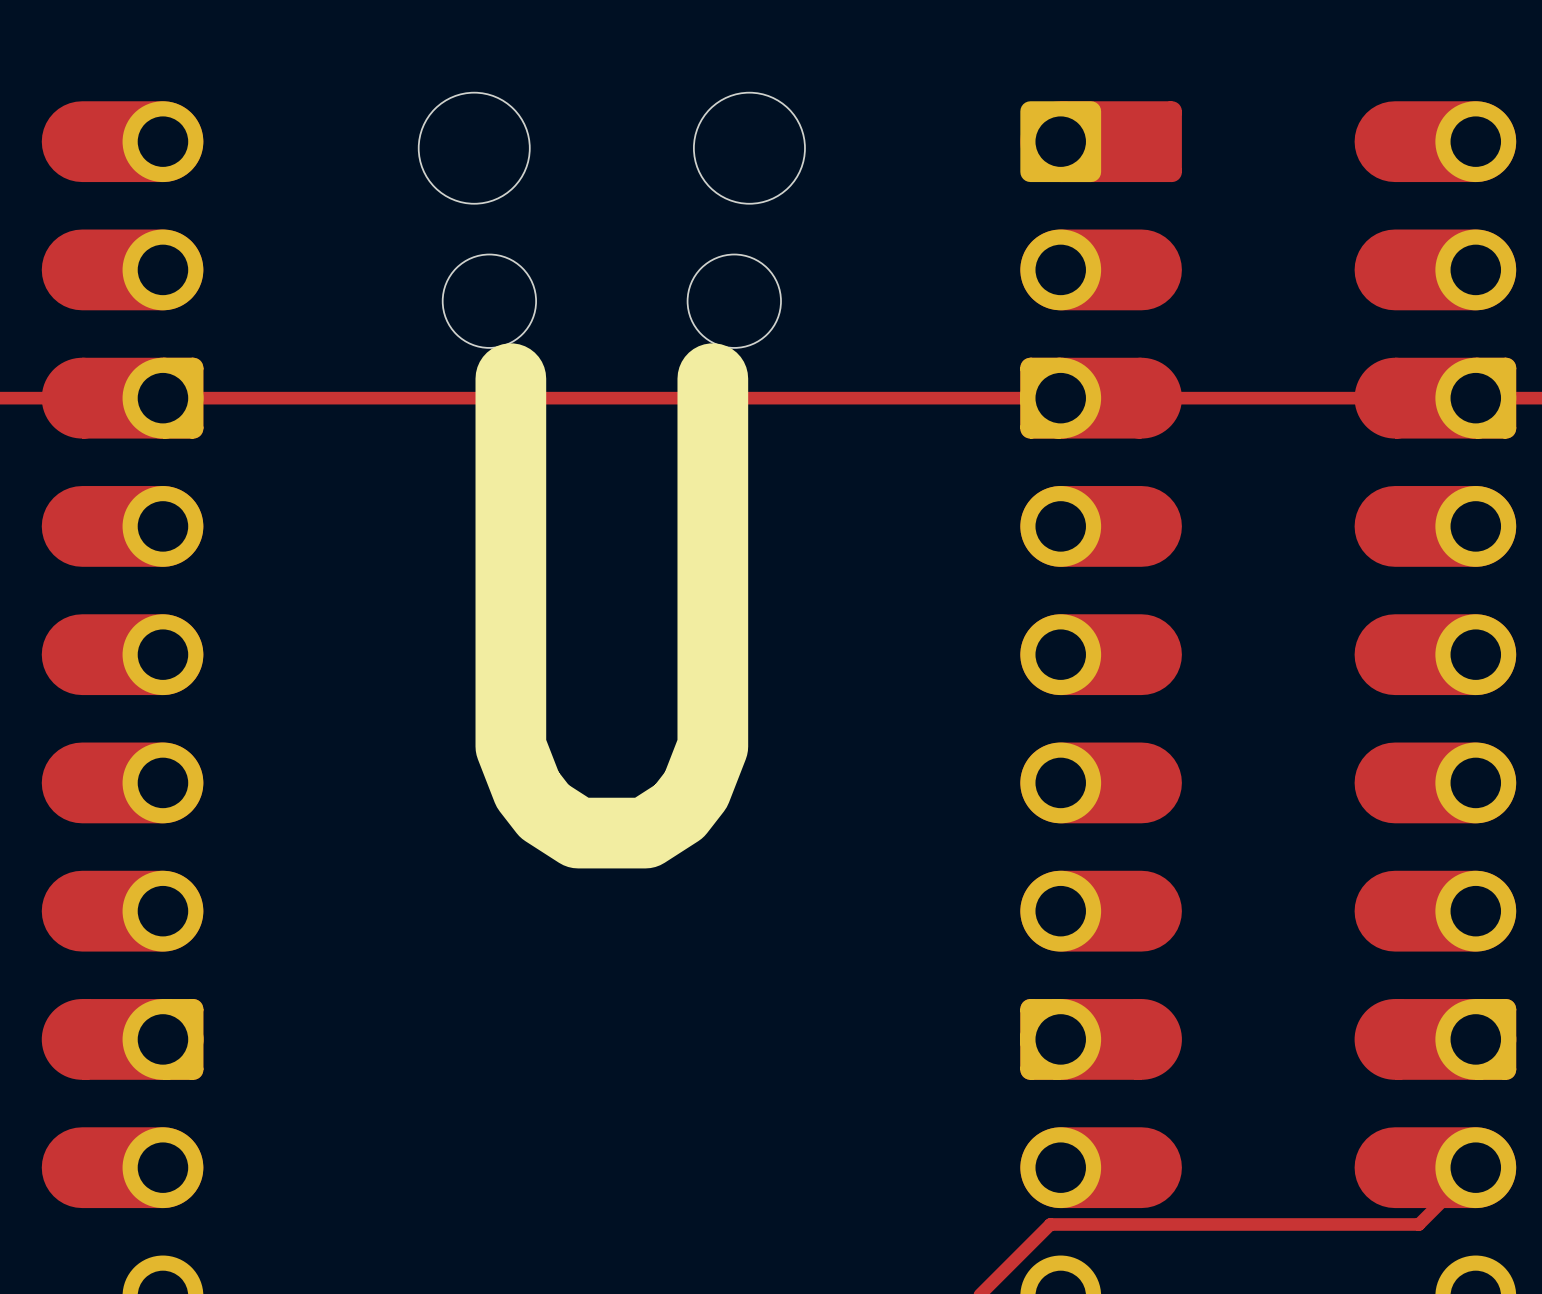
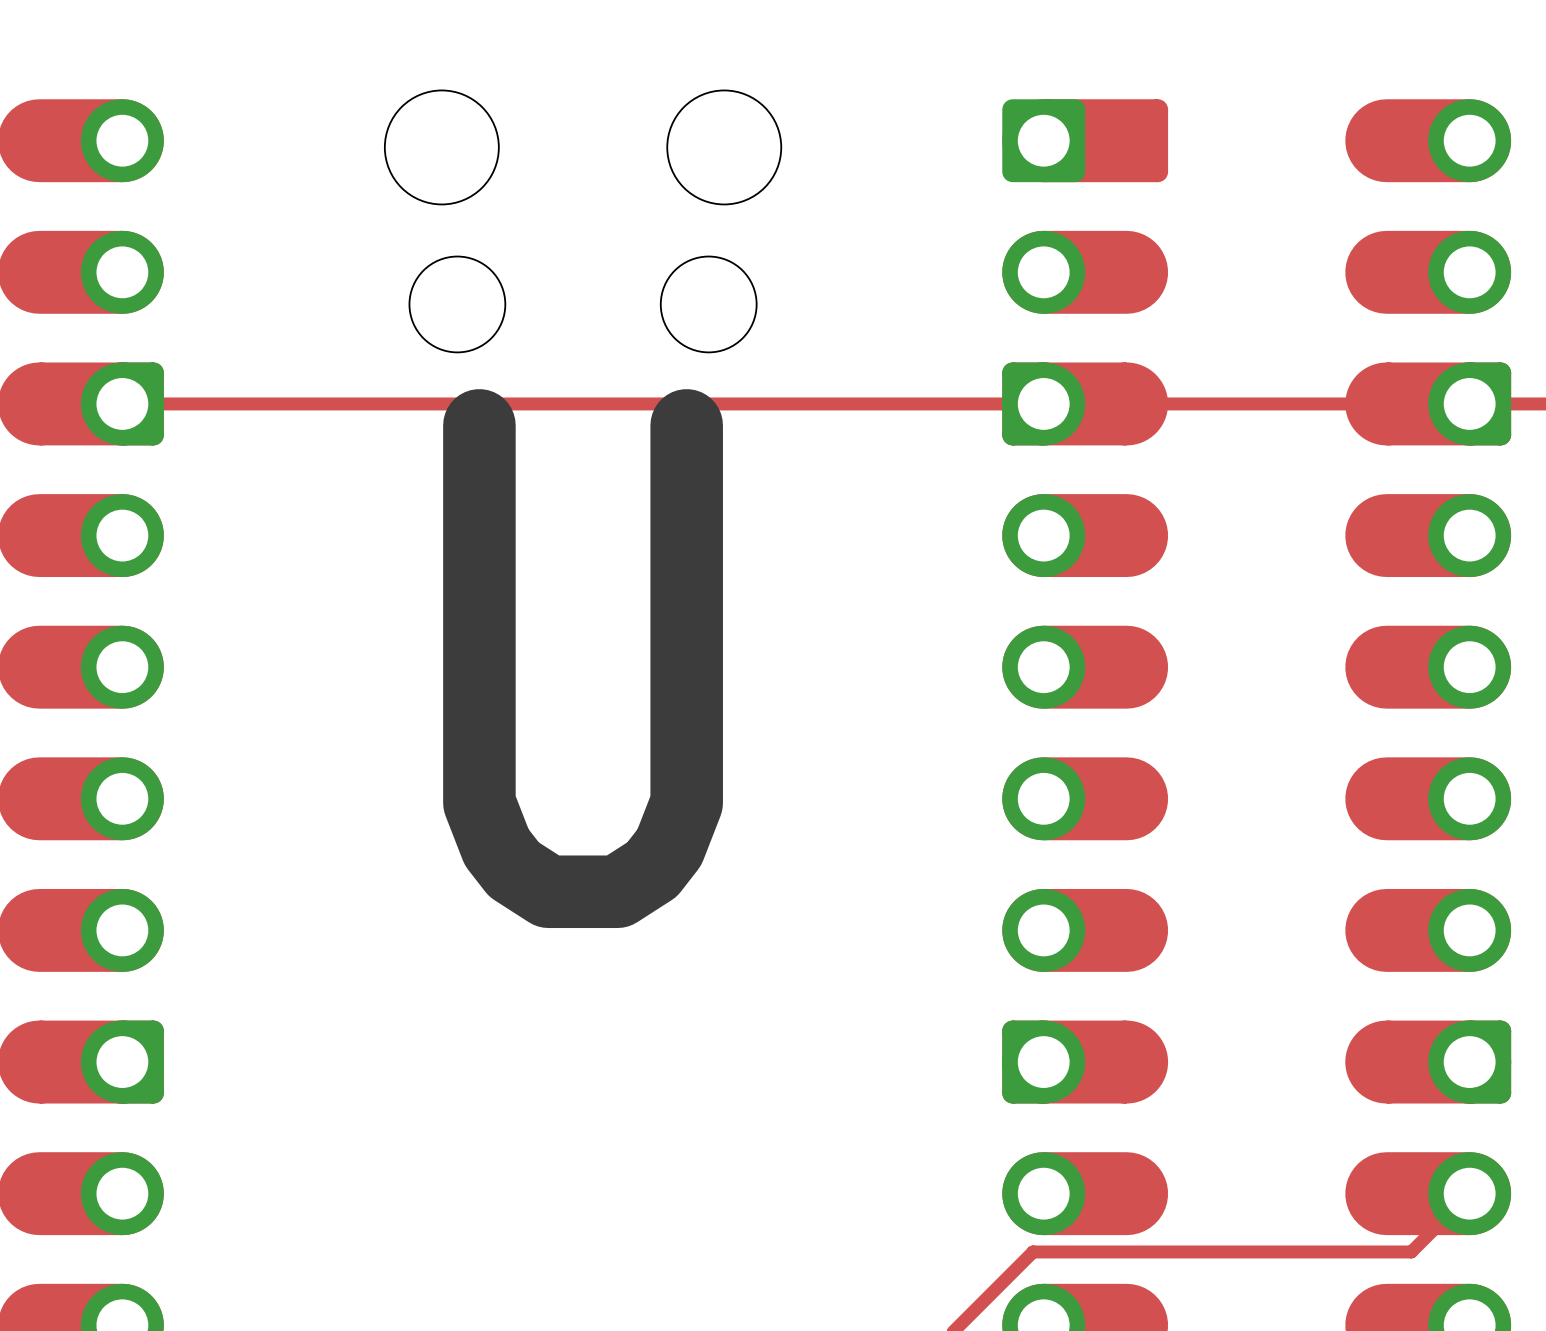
text position: U (611, 605) -> U (583, 658)

